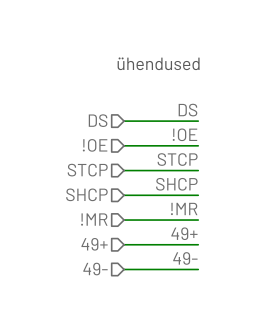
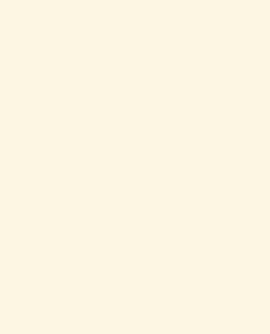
text: ühendused (158, 63) -> none
label: DS (187, 110) -> none
hierarchical label: DS (98, 120) -> none
wire: (124, 121) (198, 121) -> none
label: !OE (184, 134) -> none
hierarchical label: !OE (95, 145) -> none
wire: (124, 145) (198, 145) -> none
label: STCP (177, 159) -> none
hierarchical label: STCP (87, 170) -> none
wire: (124, 170) (198, 170) -> none
label: SHCP (176, 184) -> none
hierarchical label: SHCP (86, 194) -> none
wire: (124, 195) (198, 195) -> none
label: !MR (184, 208) -> none
hierarchical label: !MR (94, 219) -> none
wire: (124, 220) (198, 220) -> none
label: 49+ (184, 233) -> none
hierarchical label: 49+ (94, 244) -> none
wire: (124, 244) (198, 244) -> none
label: 49- (185, 258) -> none
hierarchical label: 49- (95, 269) -> none
wire: (124, 269) (198, 269) -> none

